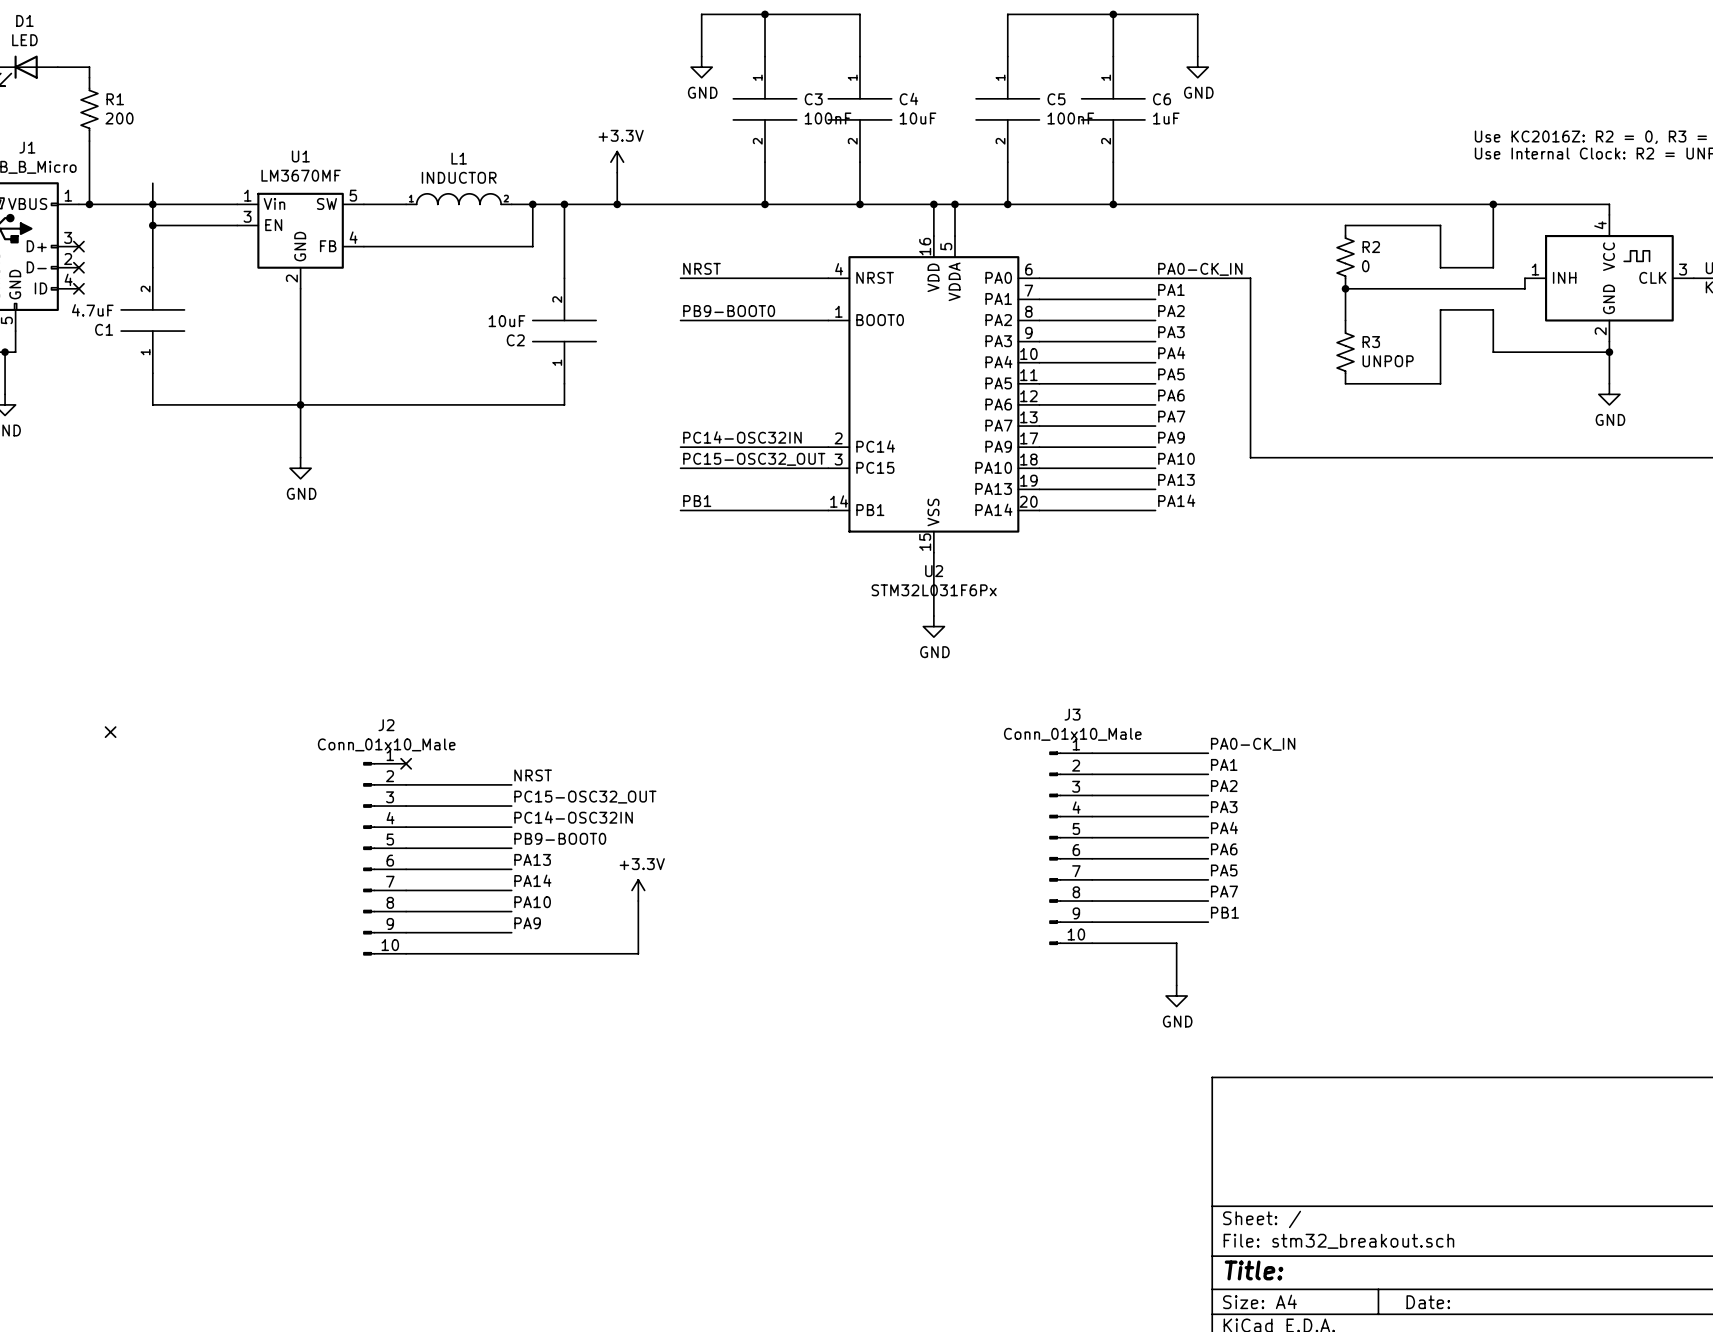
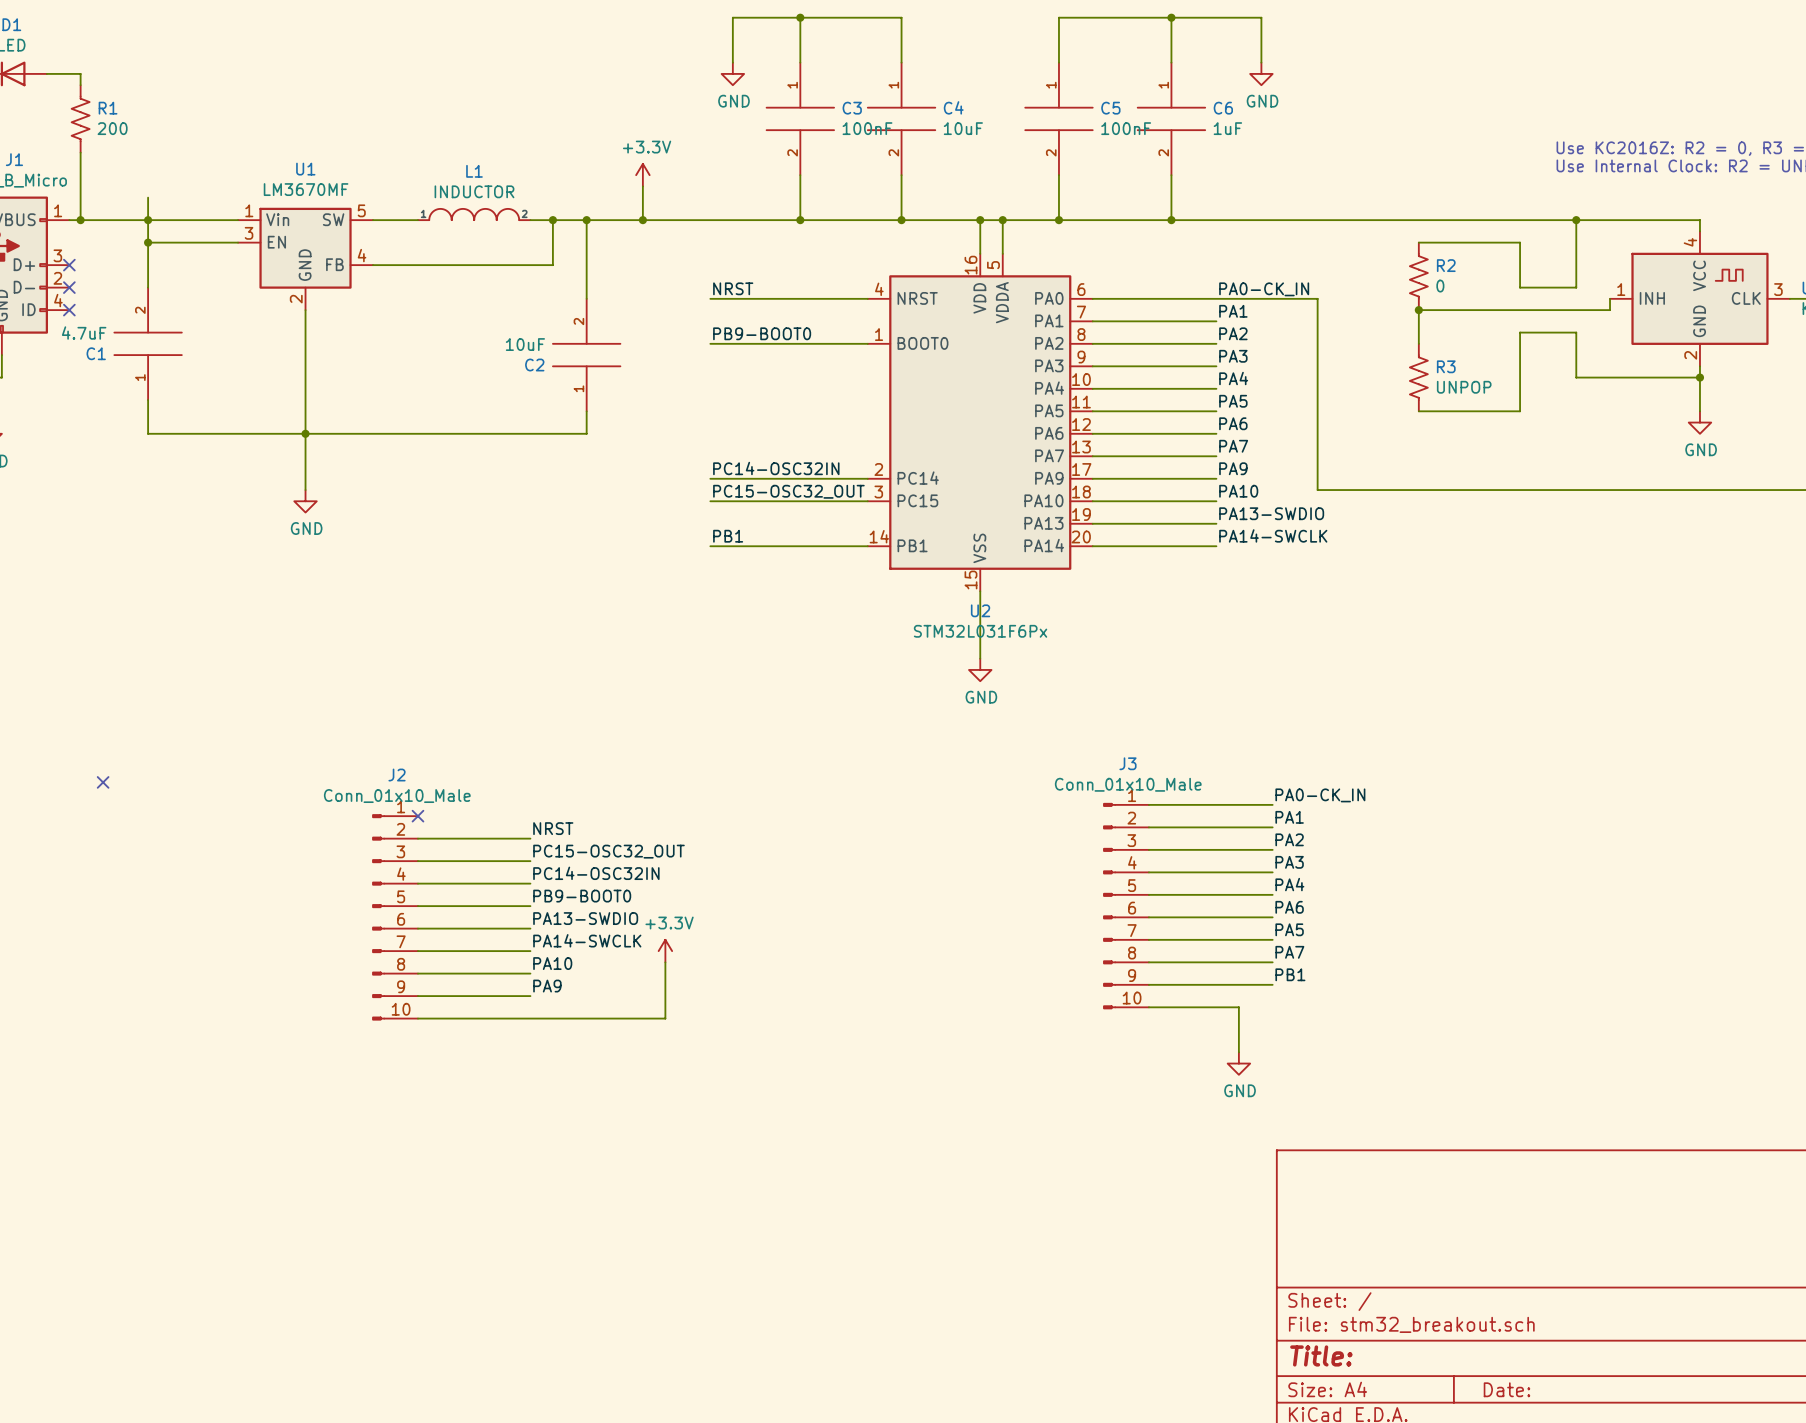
label: PA13 (1176, 479) -> PA13-SWDIO (1271, 513)
label: PA14 (1176, 500) -> PA14-SWCLK (1273, 535)
label: PA13 (532, 859) -> PA13-SWDIO (585, 918)
label: PA14 (532, 880) -> PA14-SWCLK (587, 940)

